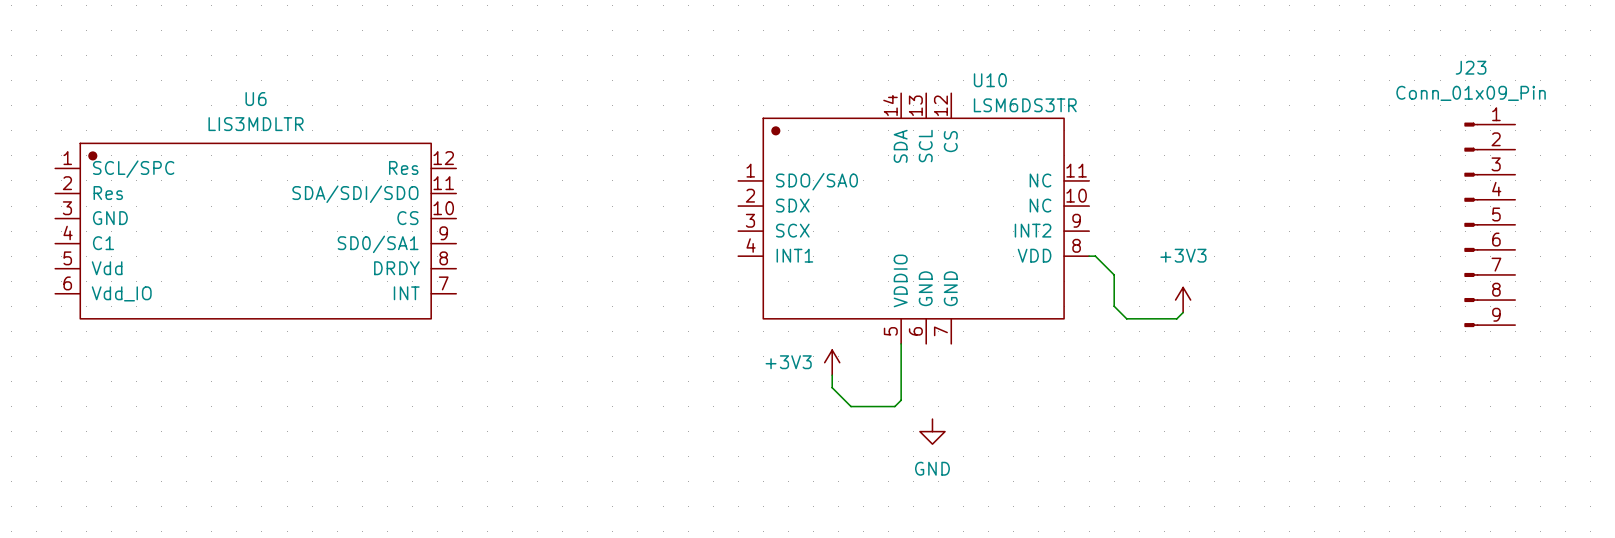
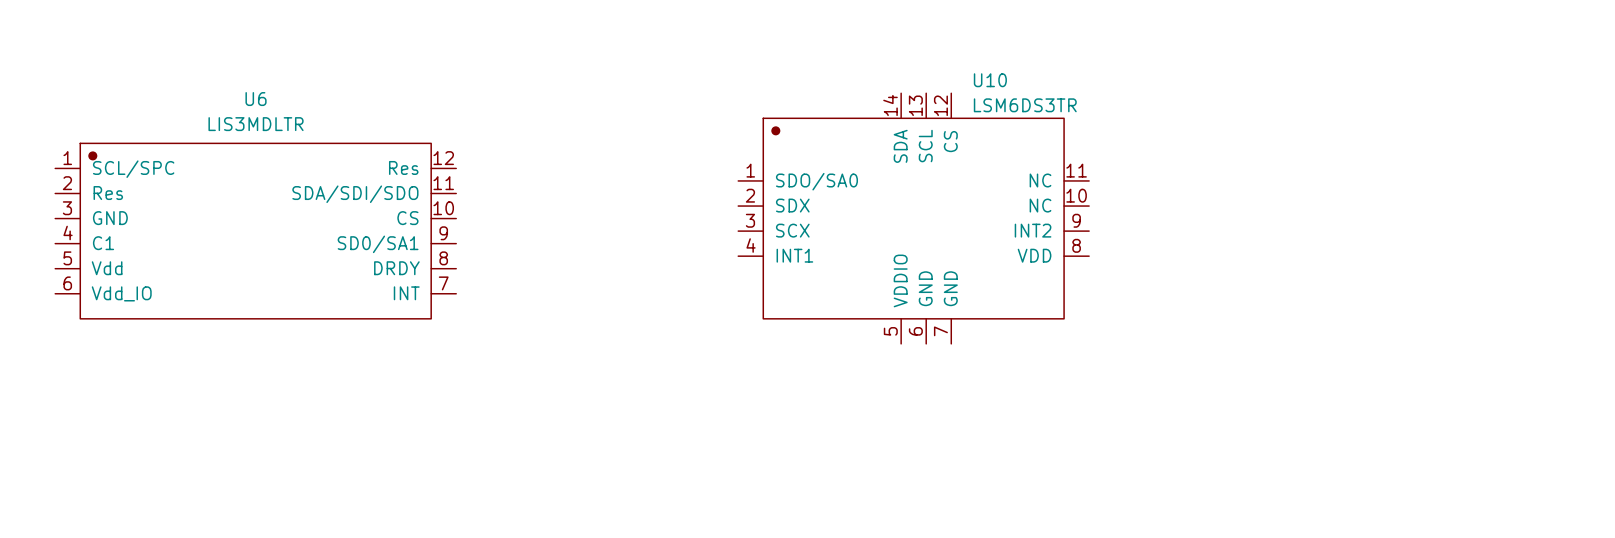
J23: Conn_01x09_Pin (1489, 224) -> none
wire: (1089, 256) (1095, 256) (1114, 274) (1114, 306) (1126, 318) (1176, 318) (1183, 312) -> none
power symbol: +3V3 (1183, 300) -> none
wire: (901, 343) (901, 400) (894, 406) (851, 406) (832, 387) (832, 375) -> none
power symbol: +3V3 (832, 362) -> none
power symbol: GND (932, 431) -> none

